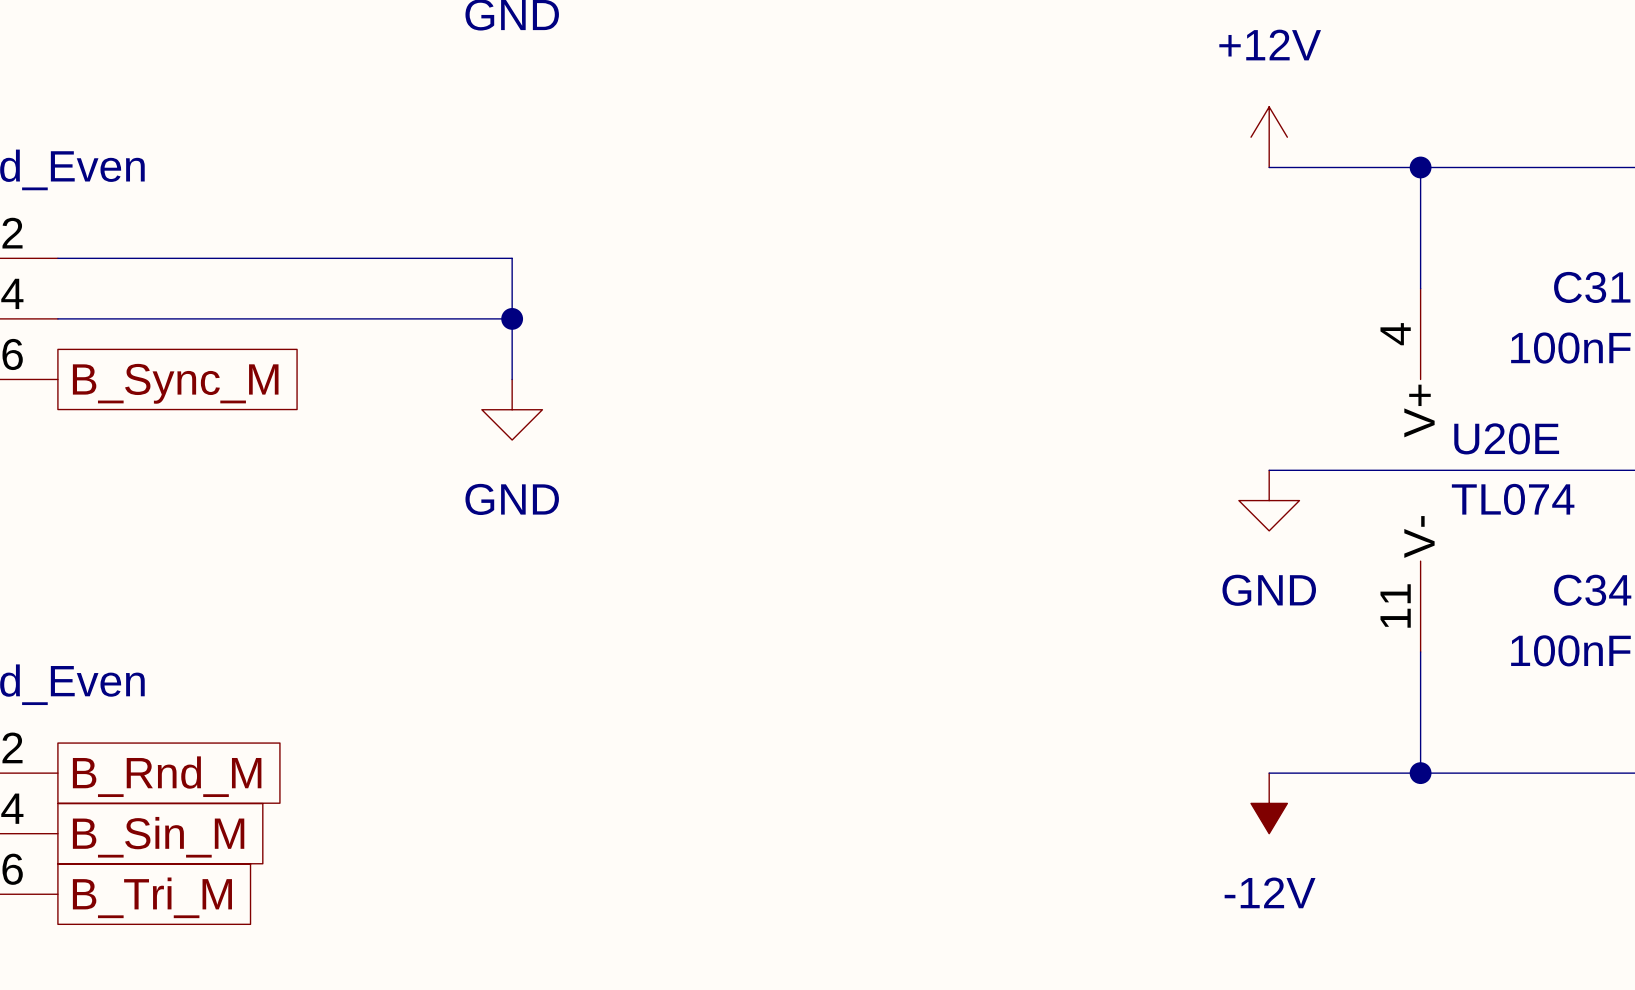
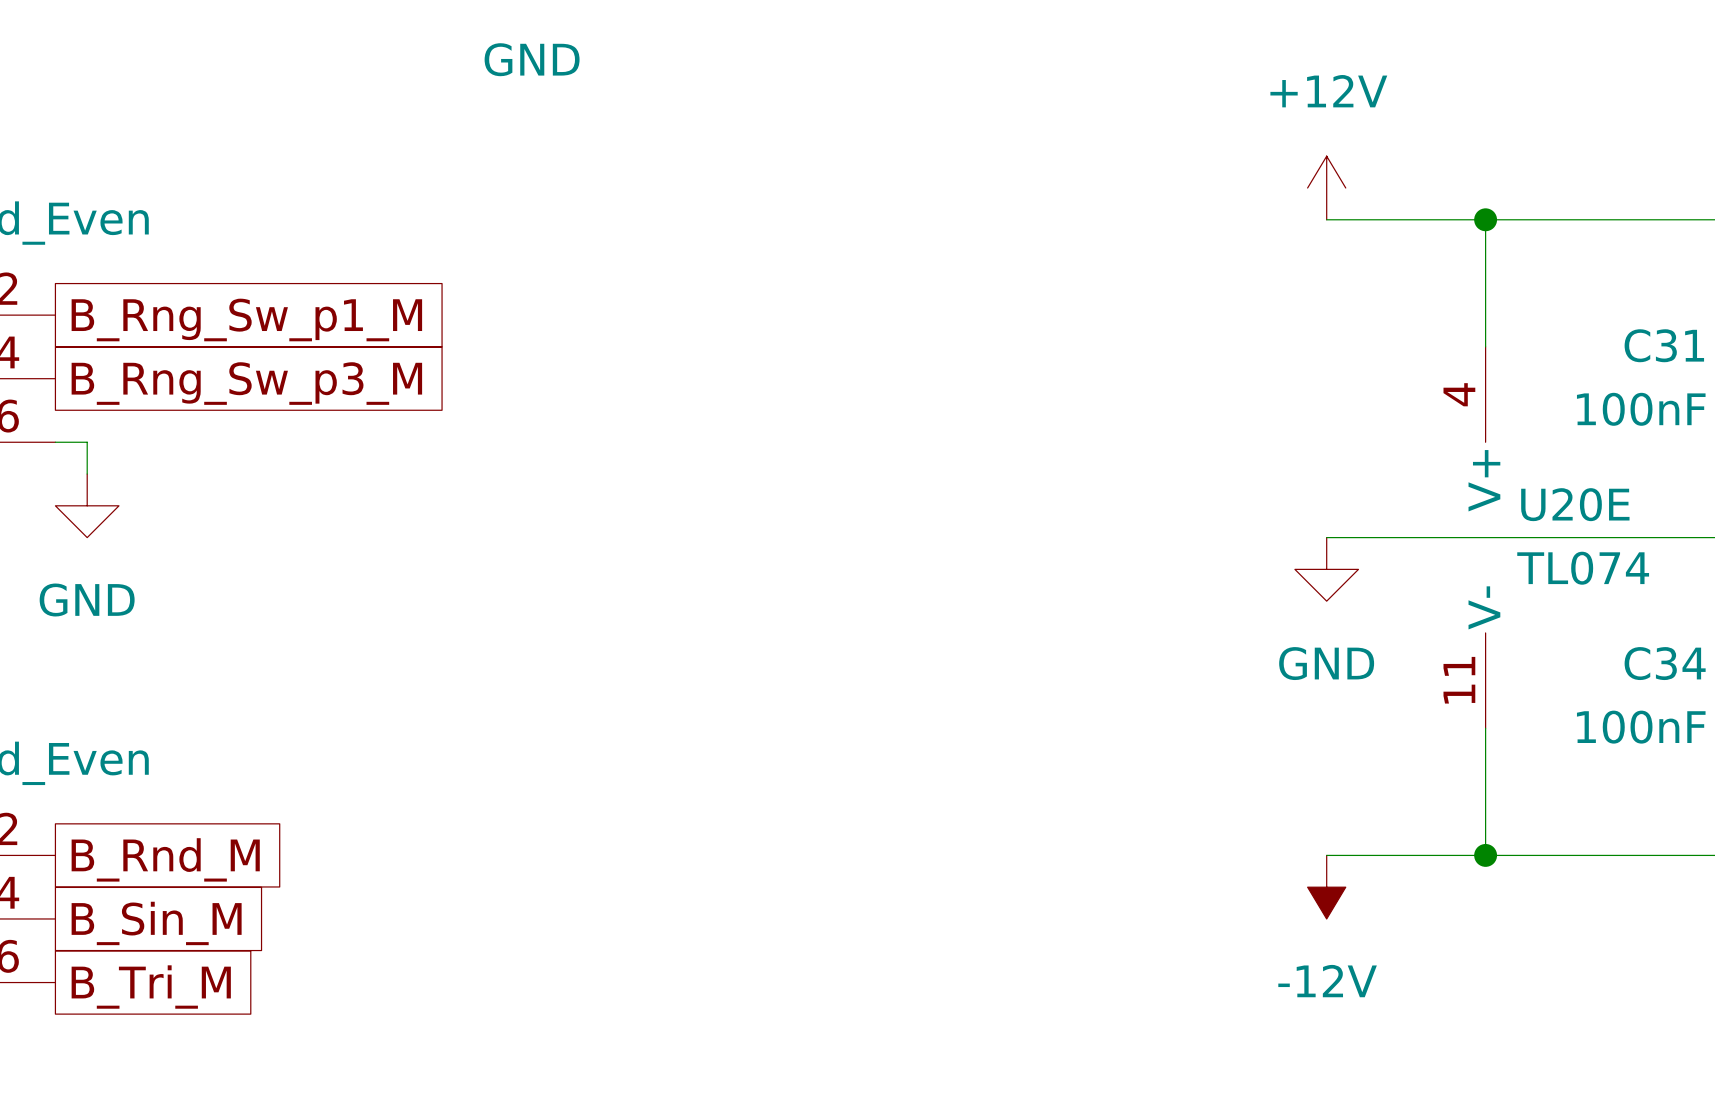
wire: (57, 258) (512, 258) (512, 379) -> none
global label: none -> B_Rng_Sw_p1_M (246, 319)
wire: (57, 318) (512, 318) -> none
junction: (512, 318) -> none
global label: none -> B_Rng_Sw_p3_M (246, 383)
wire: none -> (55, 442) (87, 442) (87, 474)
global label: B_Sync_M (175, 383) -> none
power symbol position: GND (512, 409) -> GND (87, 505)

